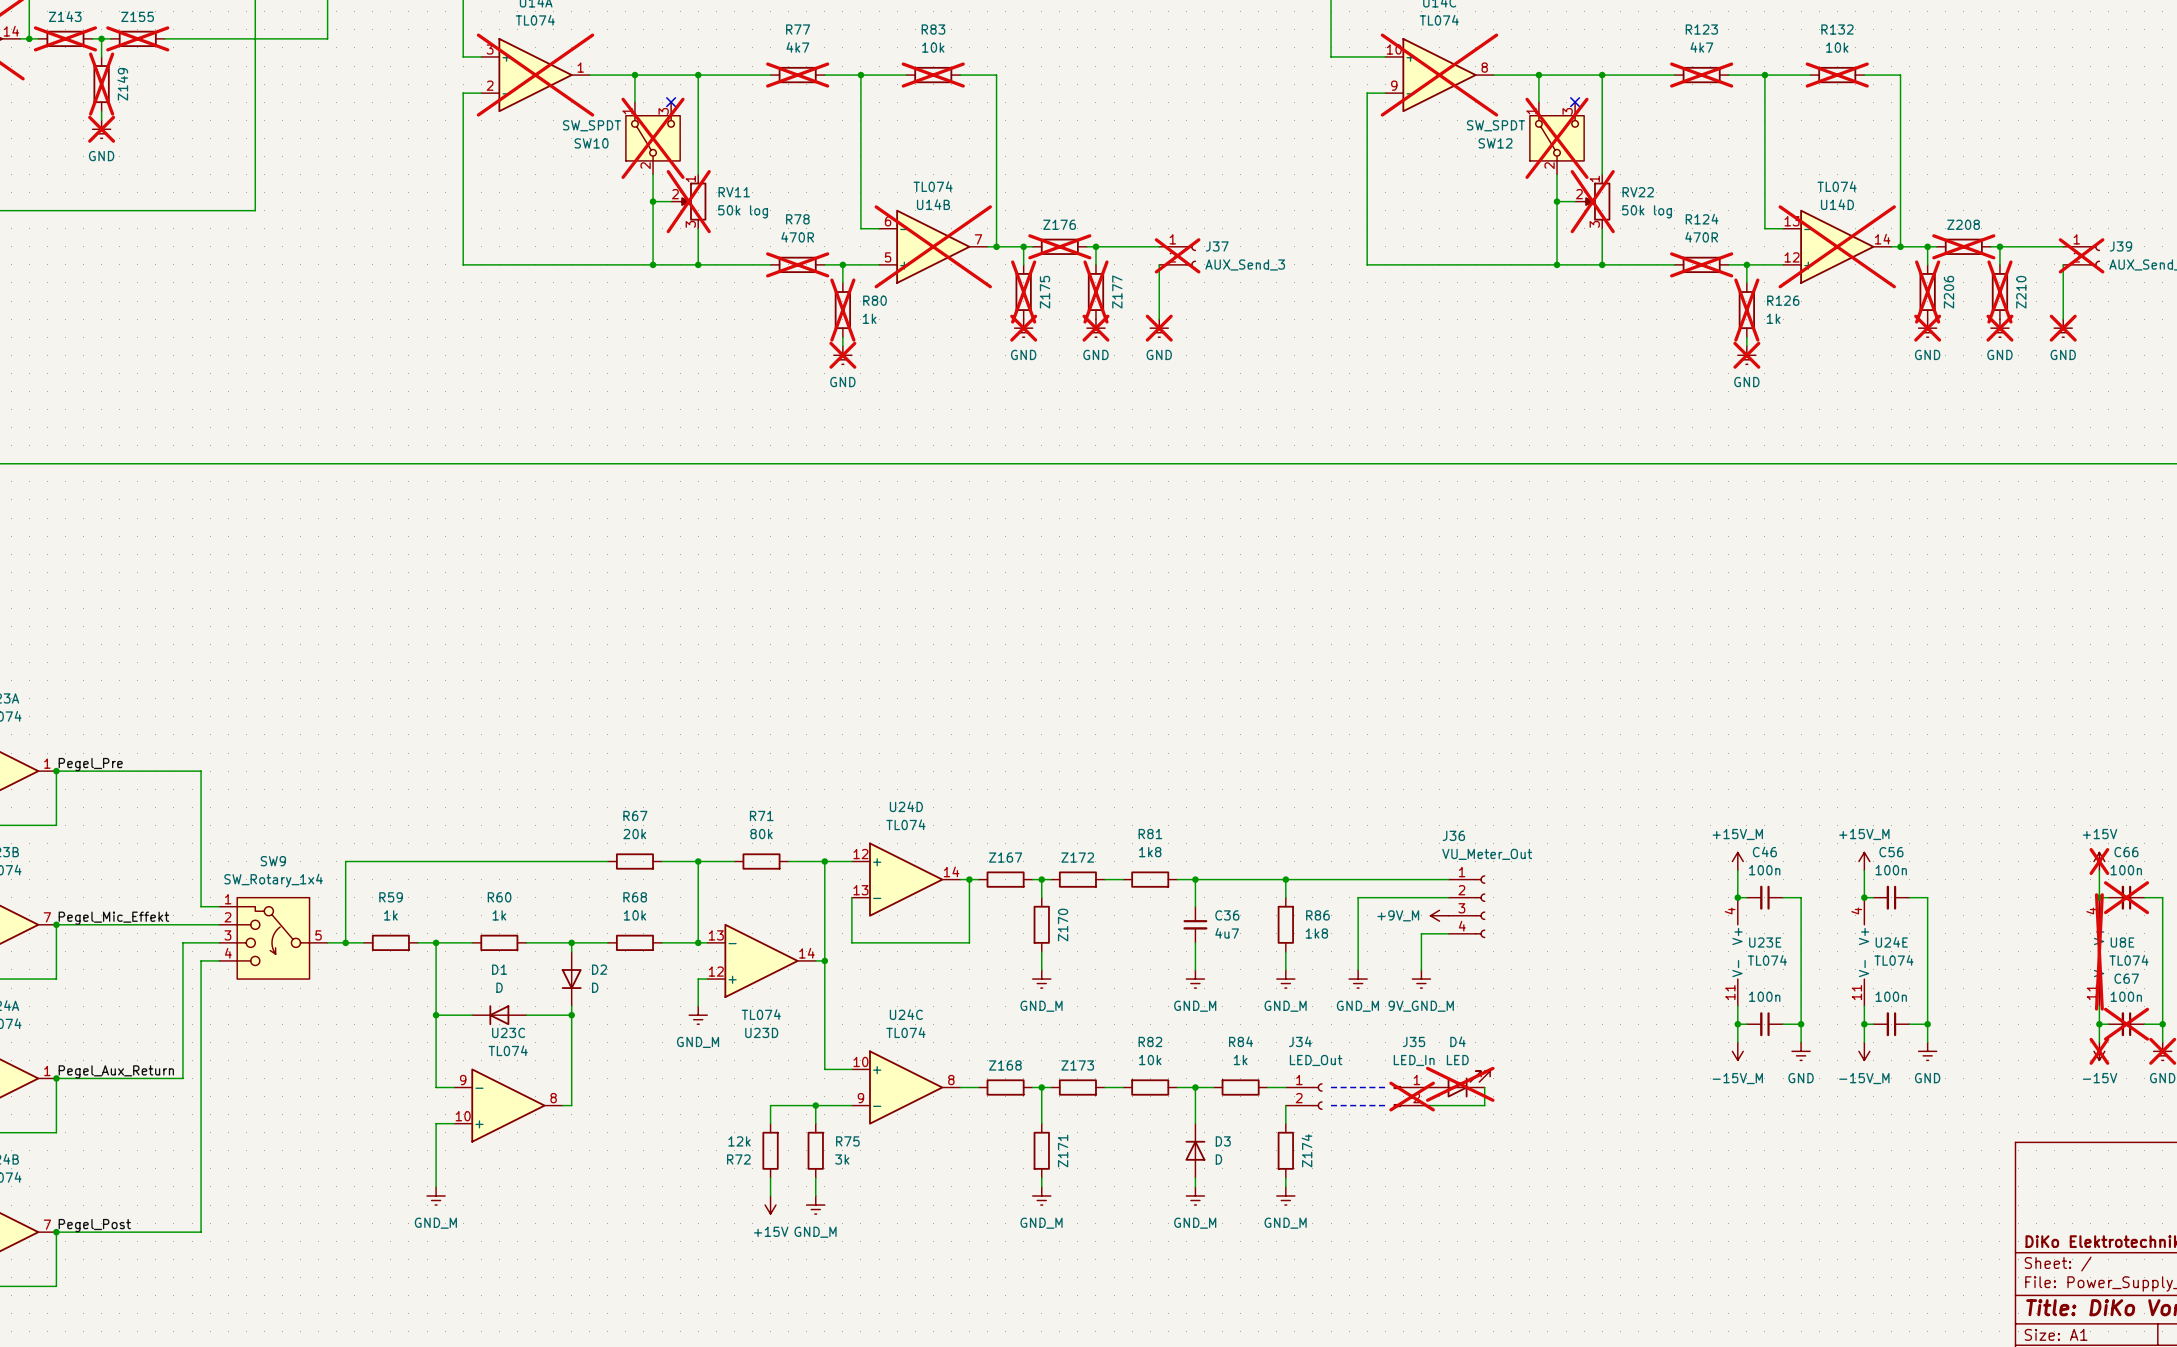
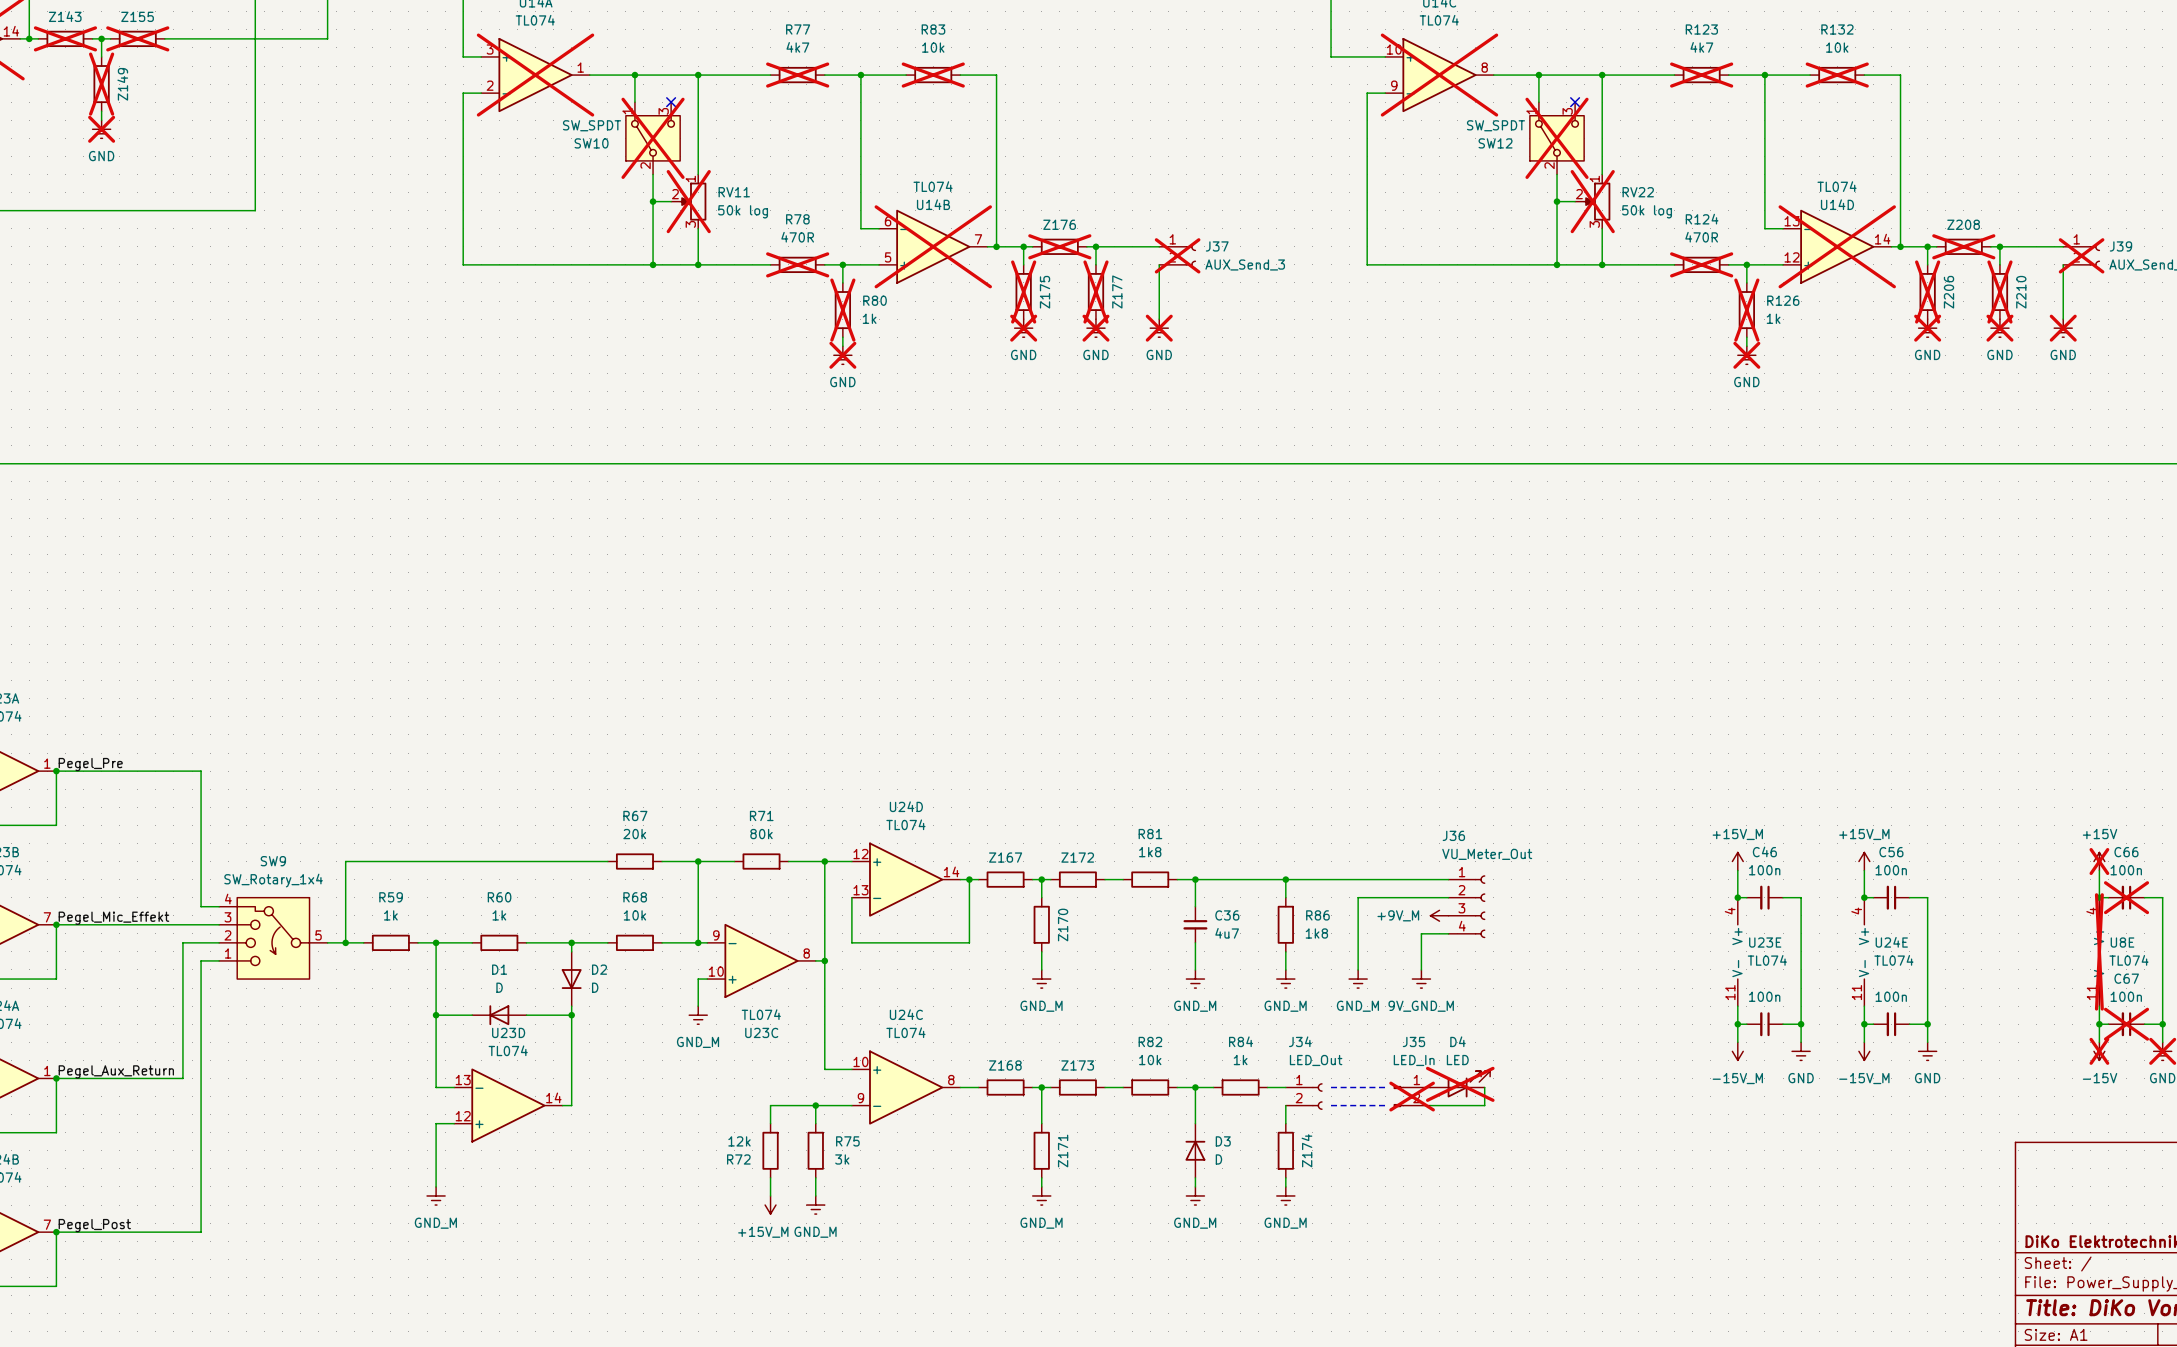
SW9 pin number: 1 (228, 899) -> 4 (228, 899)
SW9 pin number: 2 (227, 917) -> 3 (227, 917)
SW9 pin number: 3 (227, 935) -> 2 (227, 935)
SW9 pin number: 4 (228, 953) -> 1 (228, 953)
U23D position: (761, 960) -> (508, 1105)
U23C name position: U23C (508, 1032) -> U23C (761, 1032)
U23D name position: U23D (761, 1032) -> U23D (508, 1032)
U23C position: (508, 1105) -> (761, 960)
power symbol: +15V (770, 1205) -> +15V_M (770, 1205)

